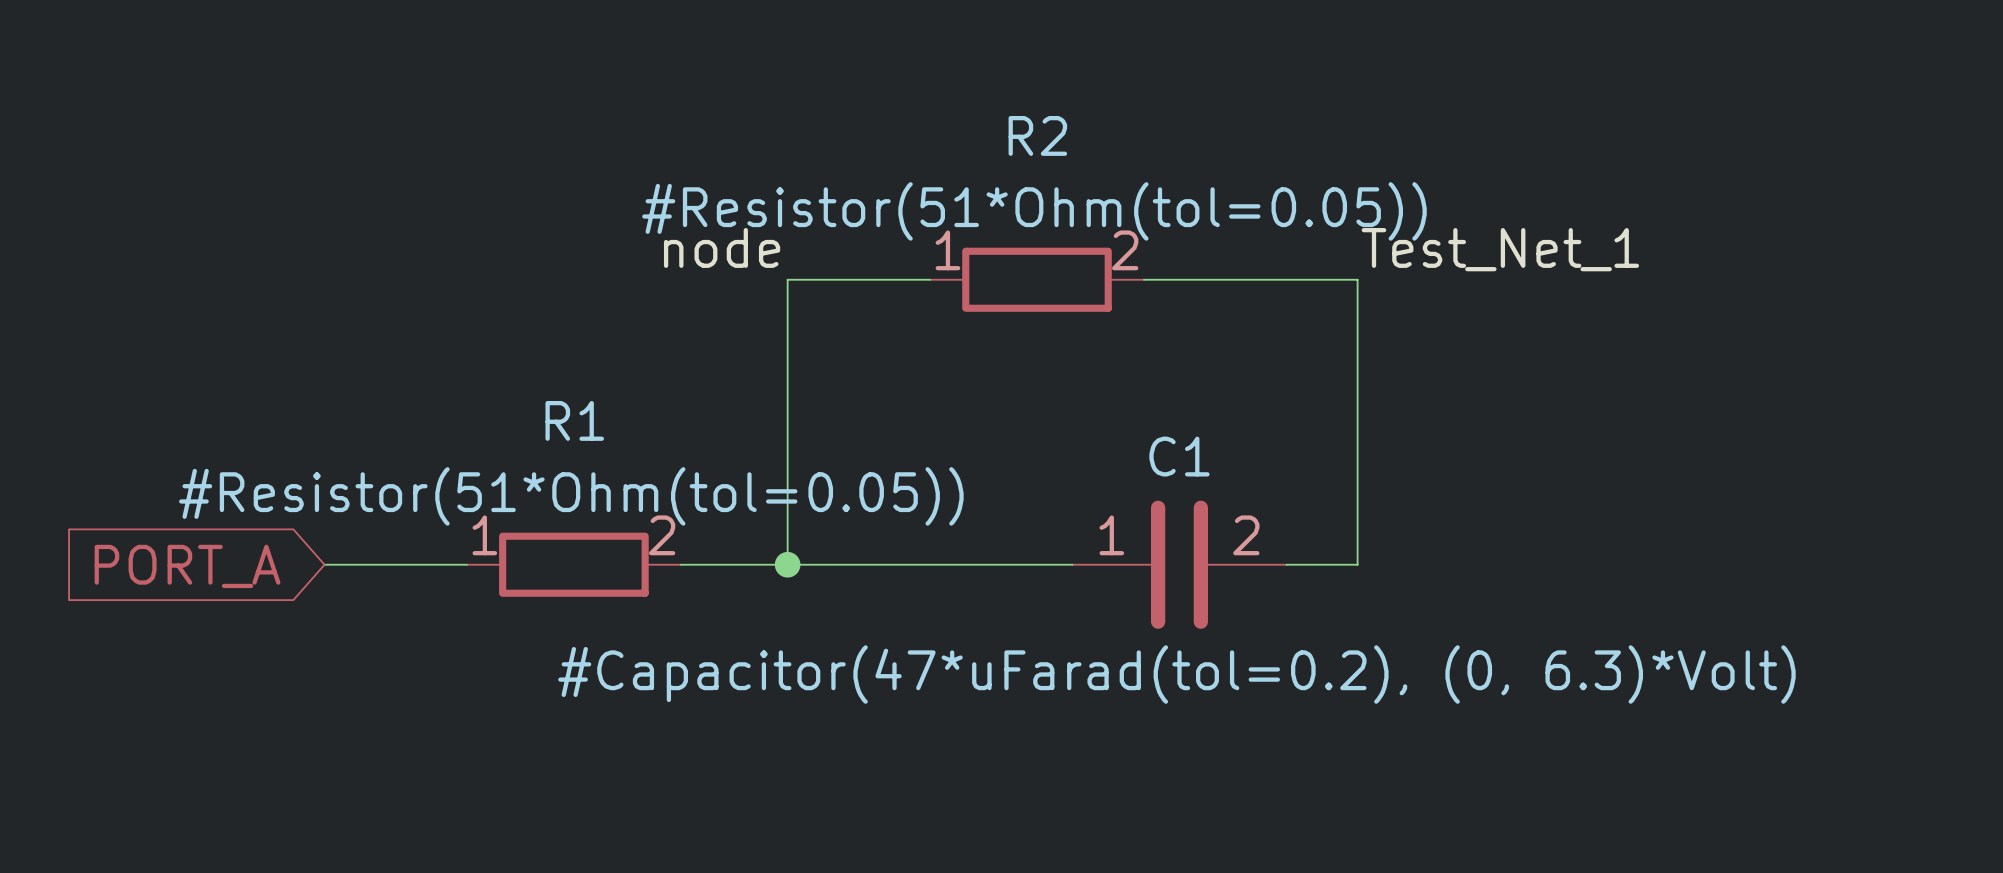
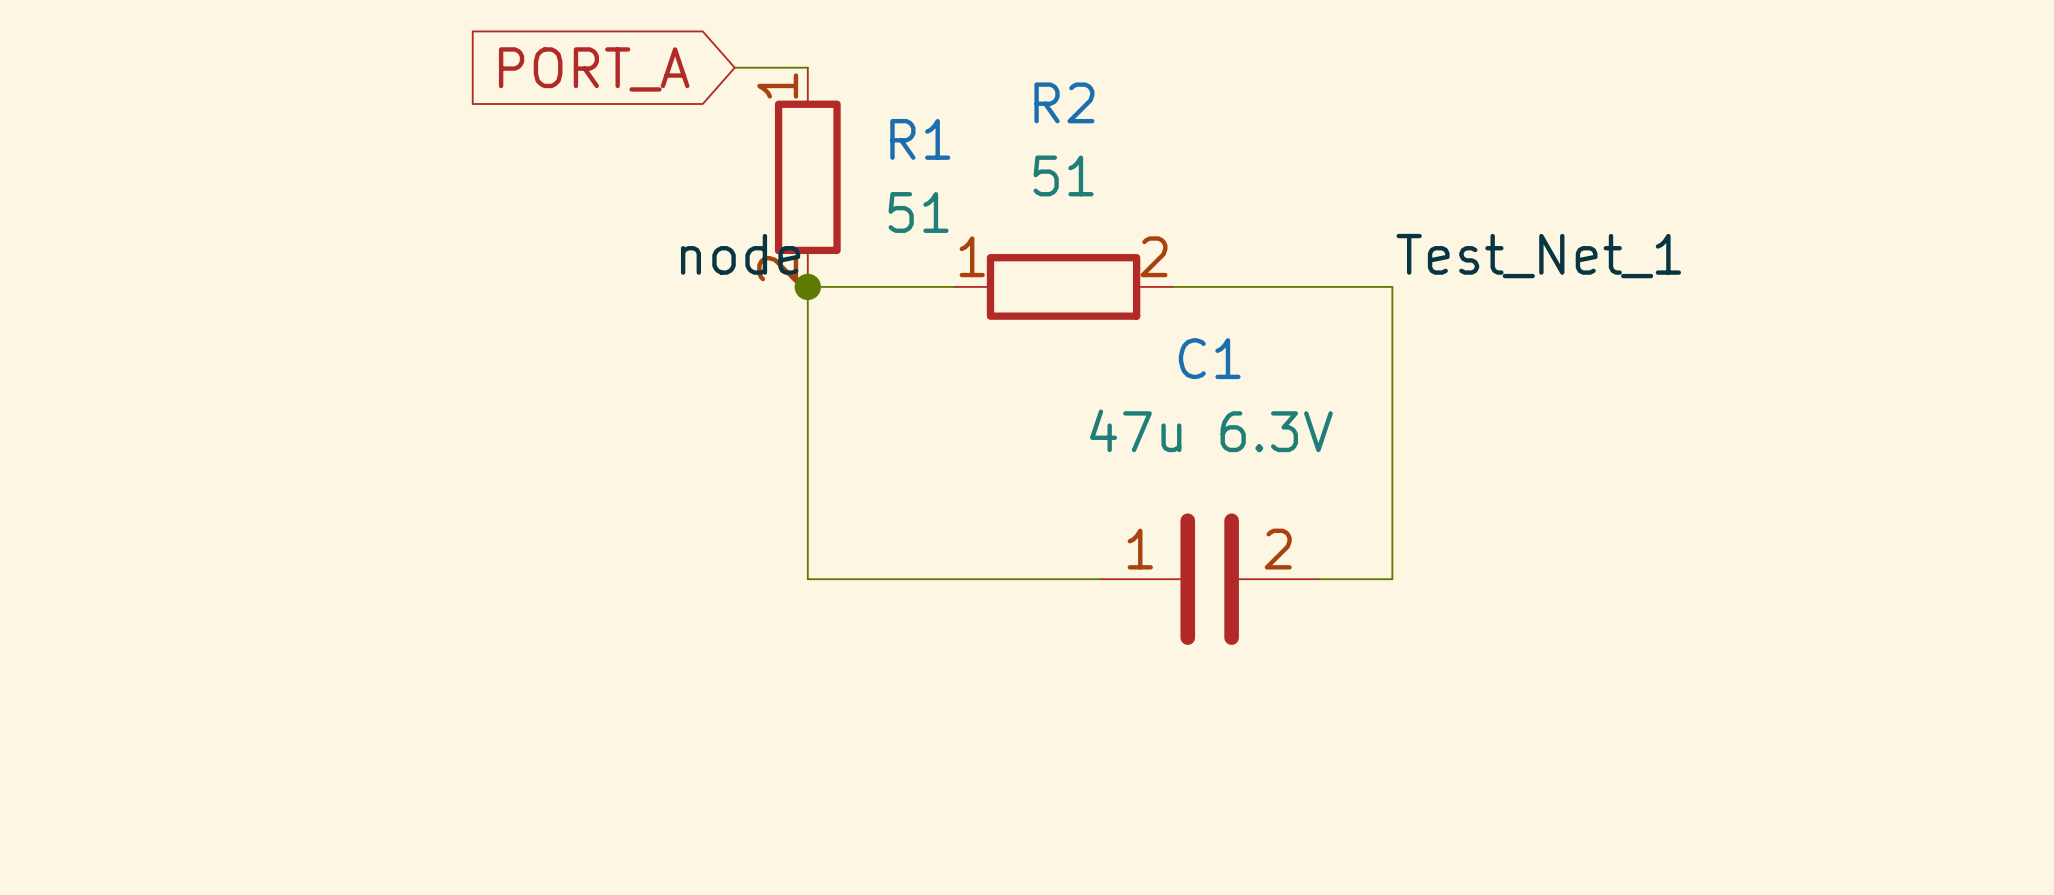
wire: none -> (734, 67) (807, 67)
R2 name position: R2 (1037, 135) -> R2 (1064, 102)
R2 value: #Resistor(51*Ohm(tol=0.05)) (1034, 211) -> 51 (1063, 175)
junction: none -> (807, 286)
C1 name position: C1 (1179, 456) -> C1 (1209, 358)
R1 value: #Resistor(51*Ohm(tol=0.05)) (571, 496) -> 51 (918, 212)
wire: (324, 564) (467, 564) -> none
R1 rotation: 0° (573, 564) -> 90° clockwise (807, 177)
R1 position: (573, 564) -> (807, 177)
wire: (680, 564) (787, 564) -> none
junction: (787, 564) -> none
global label position: PORT_A (187, 566) -> PORT_A (594, 69)
C1 value: #Capacitor(47*uFarad(tol=0.2), (0, 6.3)*Volt) (1176, 674) -> 47u 6.3V (1211, 430)

